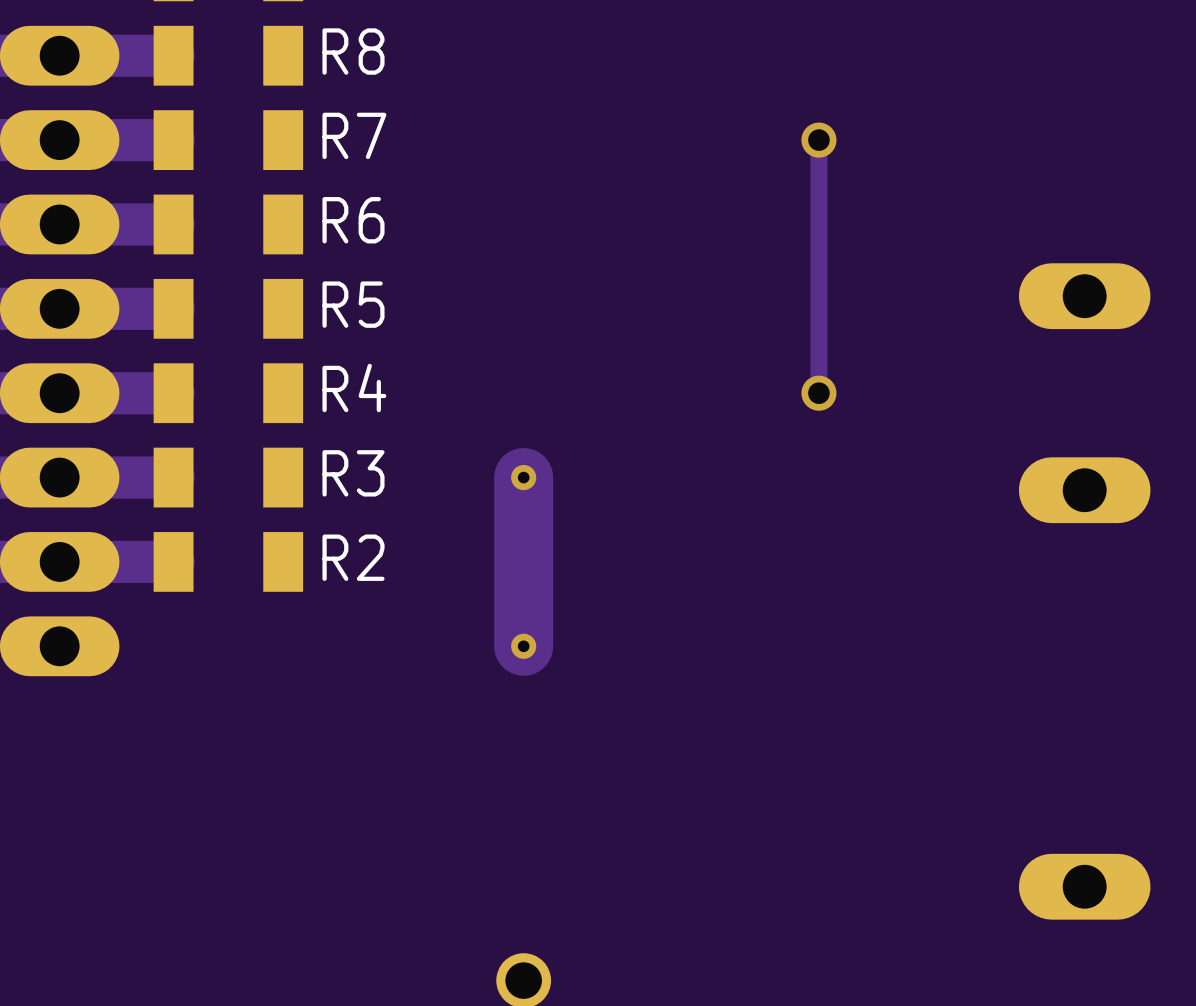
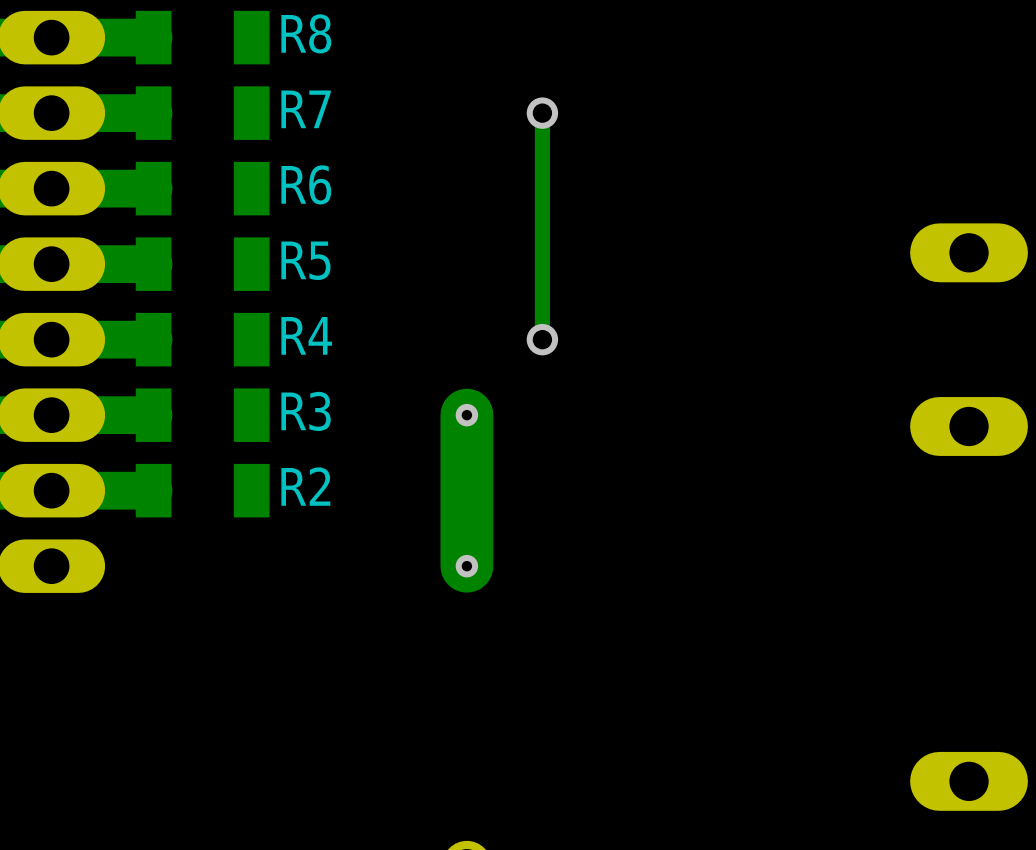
via: none -> (542, 113)
track: (818, 140) (818, 393) -> (542, 113) (542, 339)
via: (818, 140) -> none
via: none -> (542, 339)
via: (818, 393) -> none

